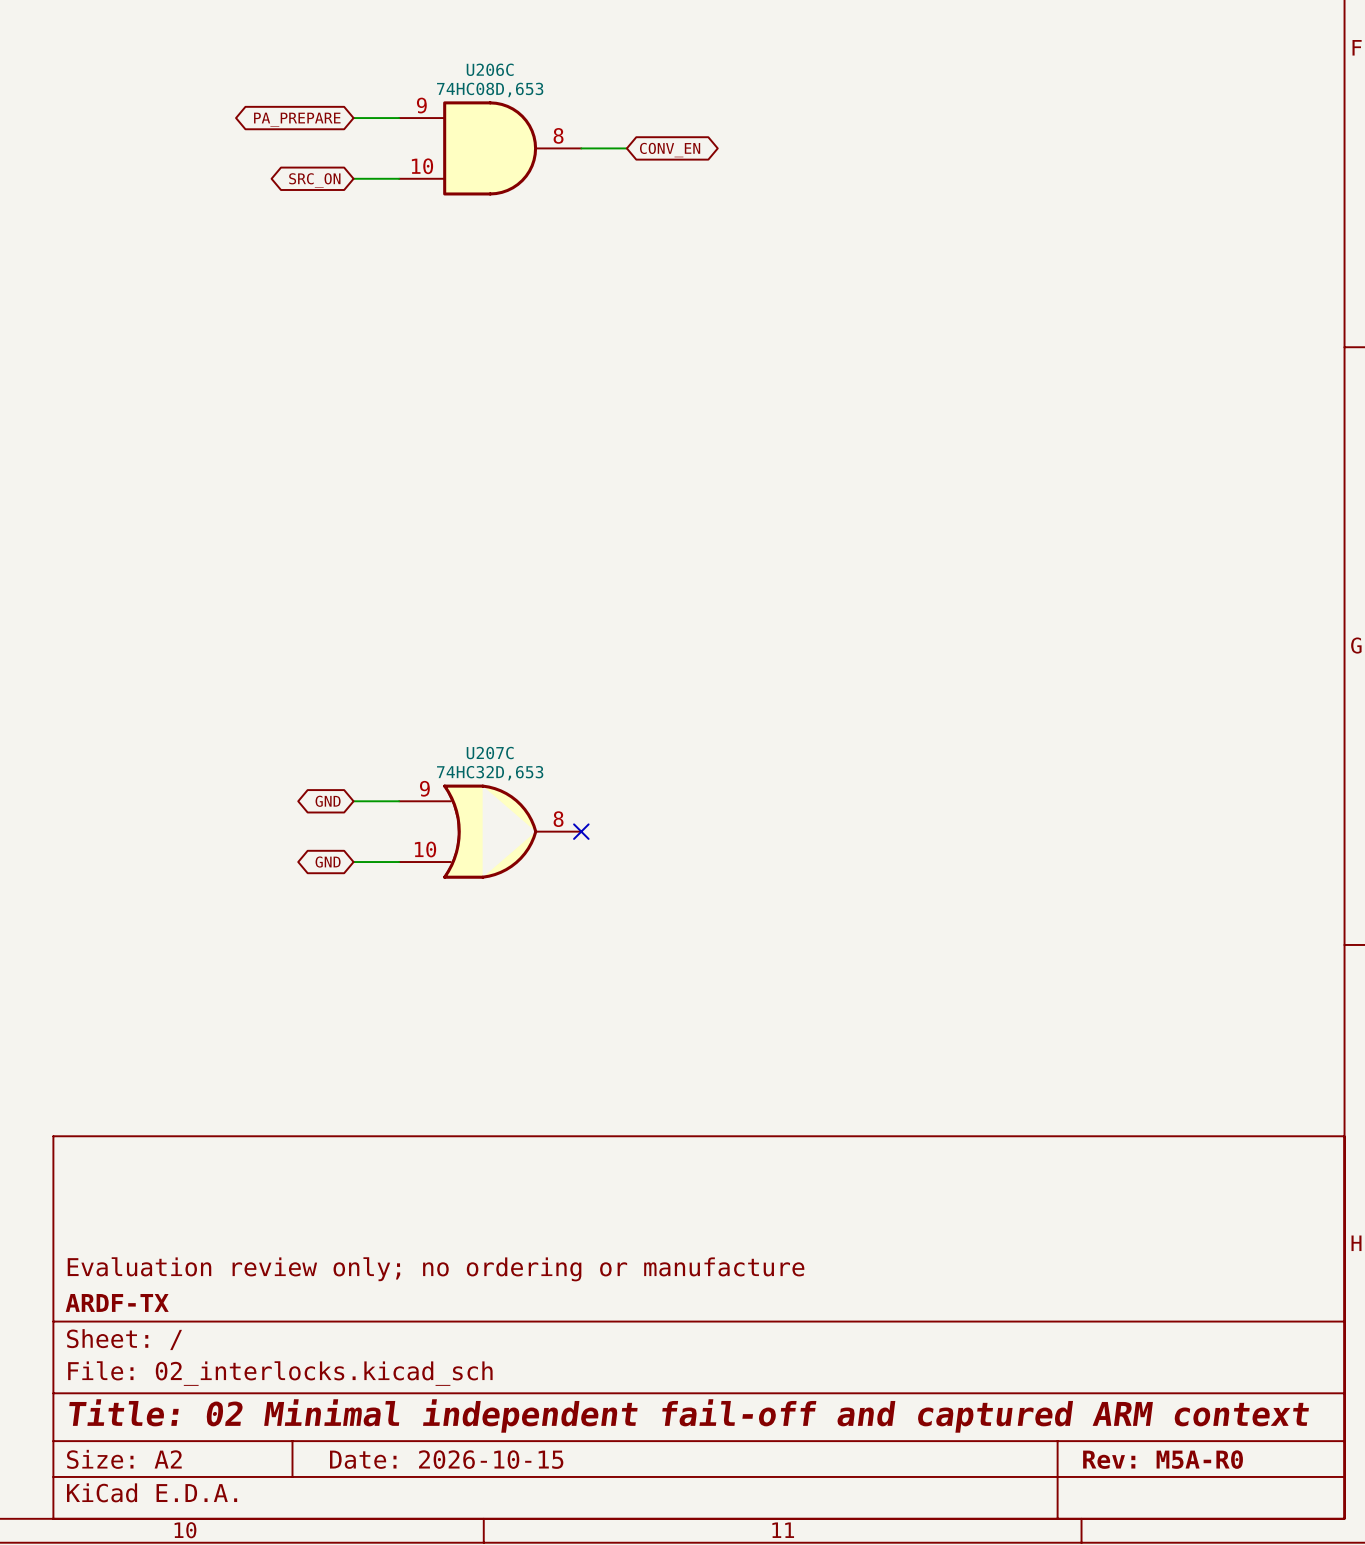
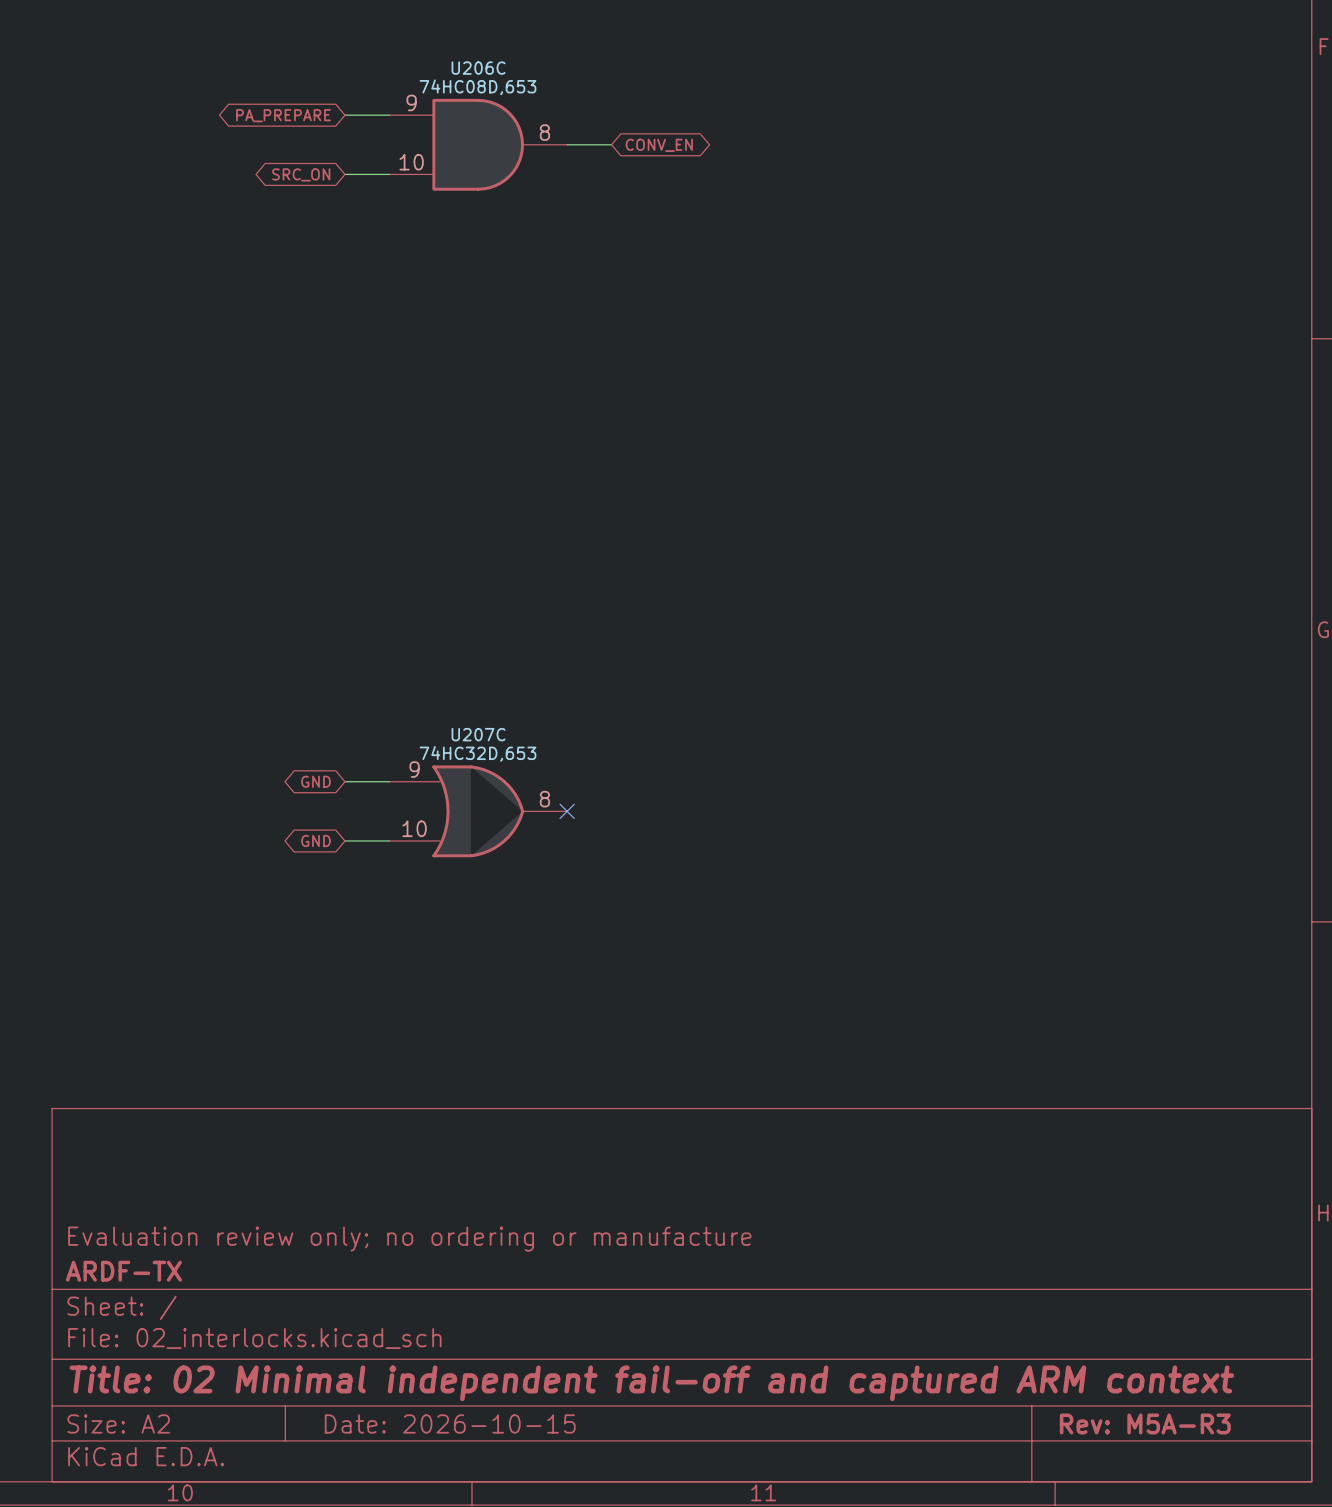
title block: Rev: M5A-R0 (1163, 1459) -> Rev: M5A-R3 (1145, 1423)

